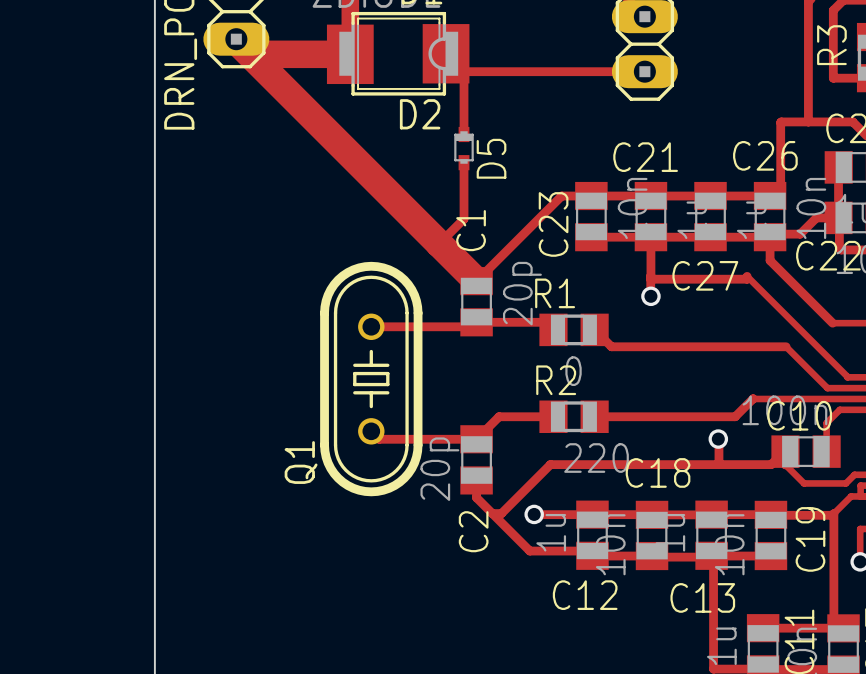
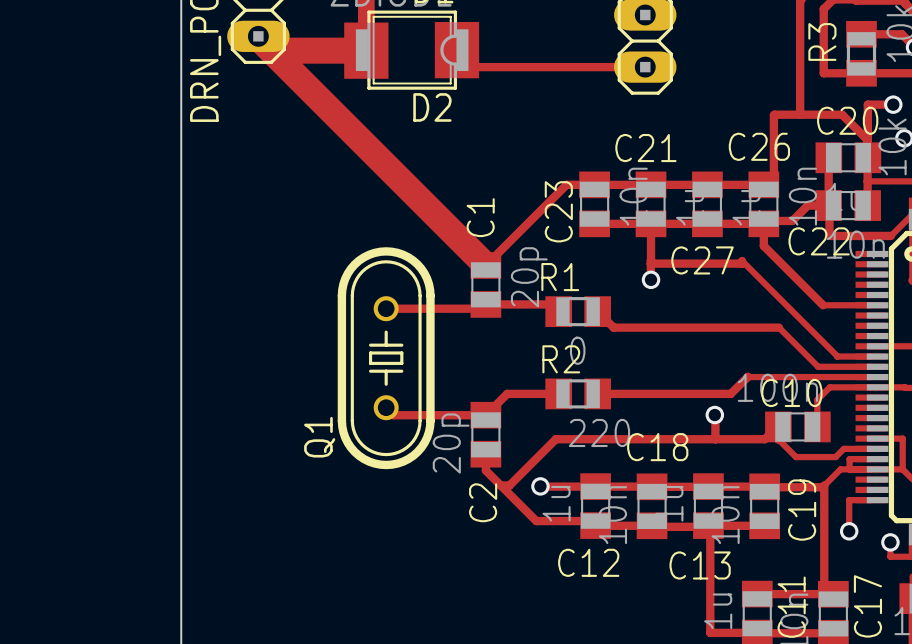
track: (464, 71) (464, 134) -> none
D5: (464, 148) -> none
track: (464, 162) (464, 218) (439, 243) -> none

